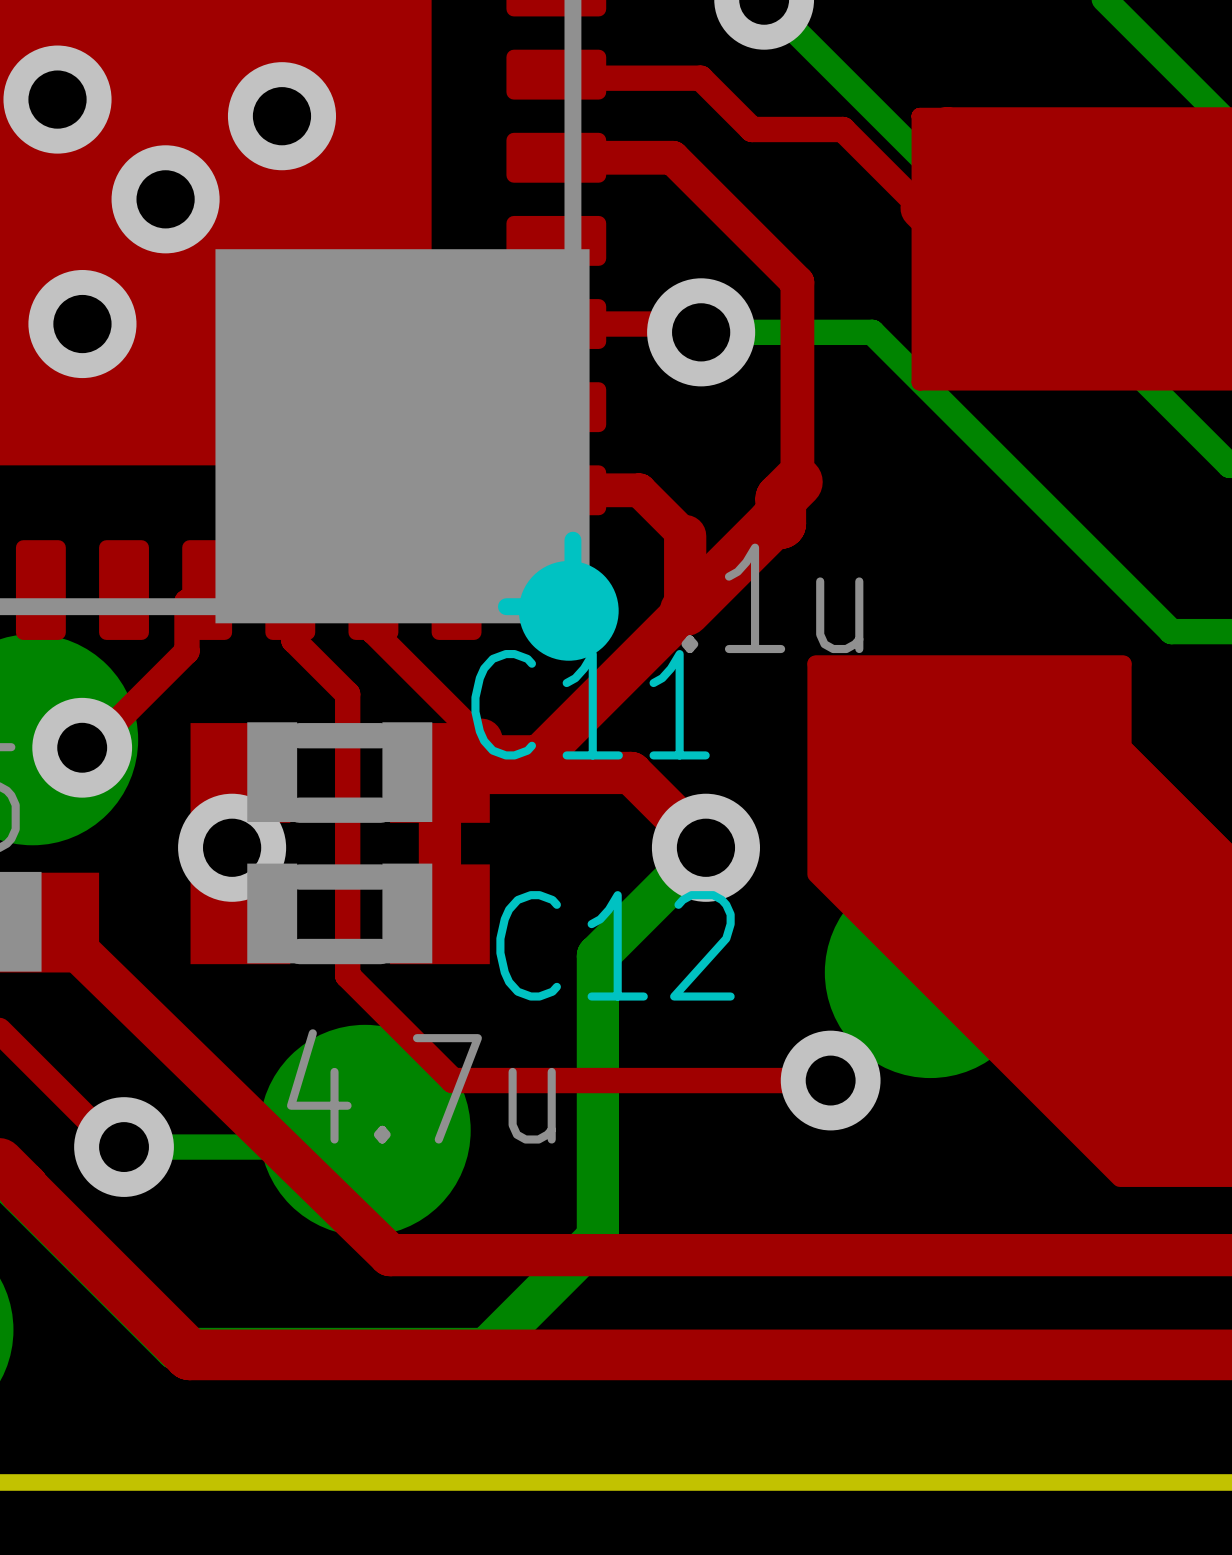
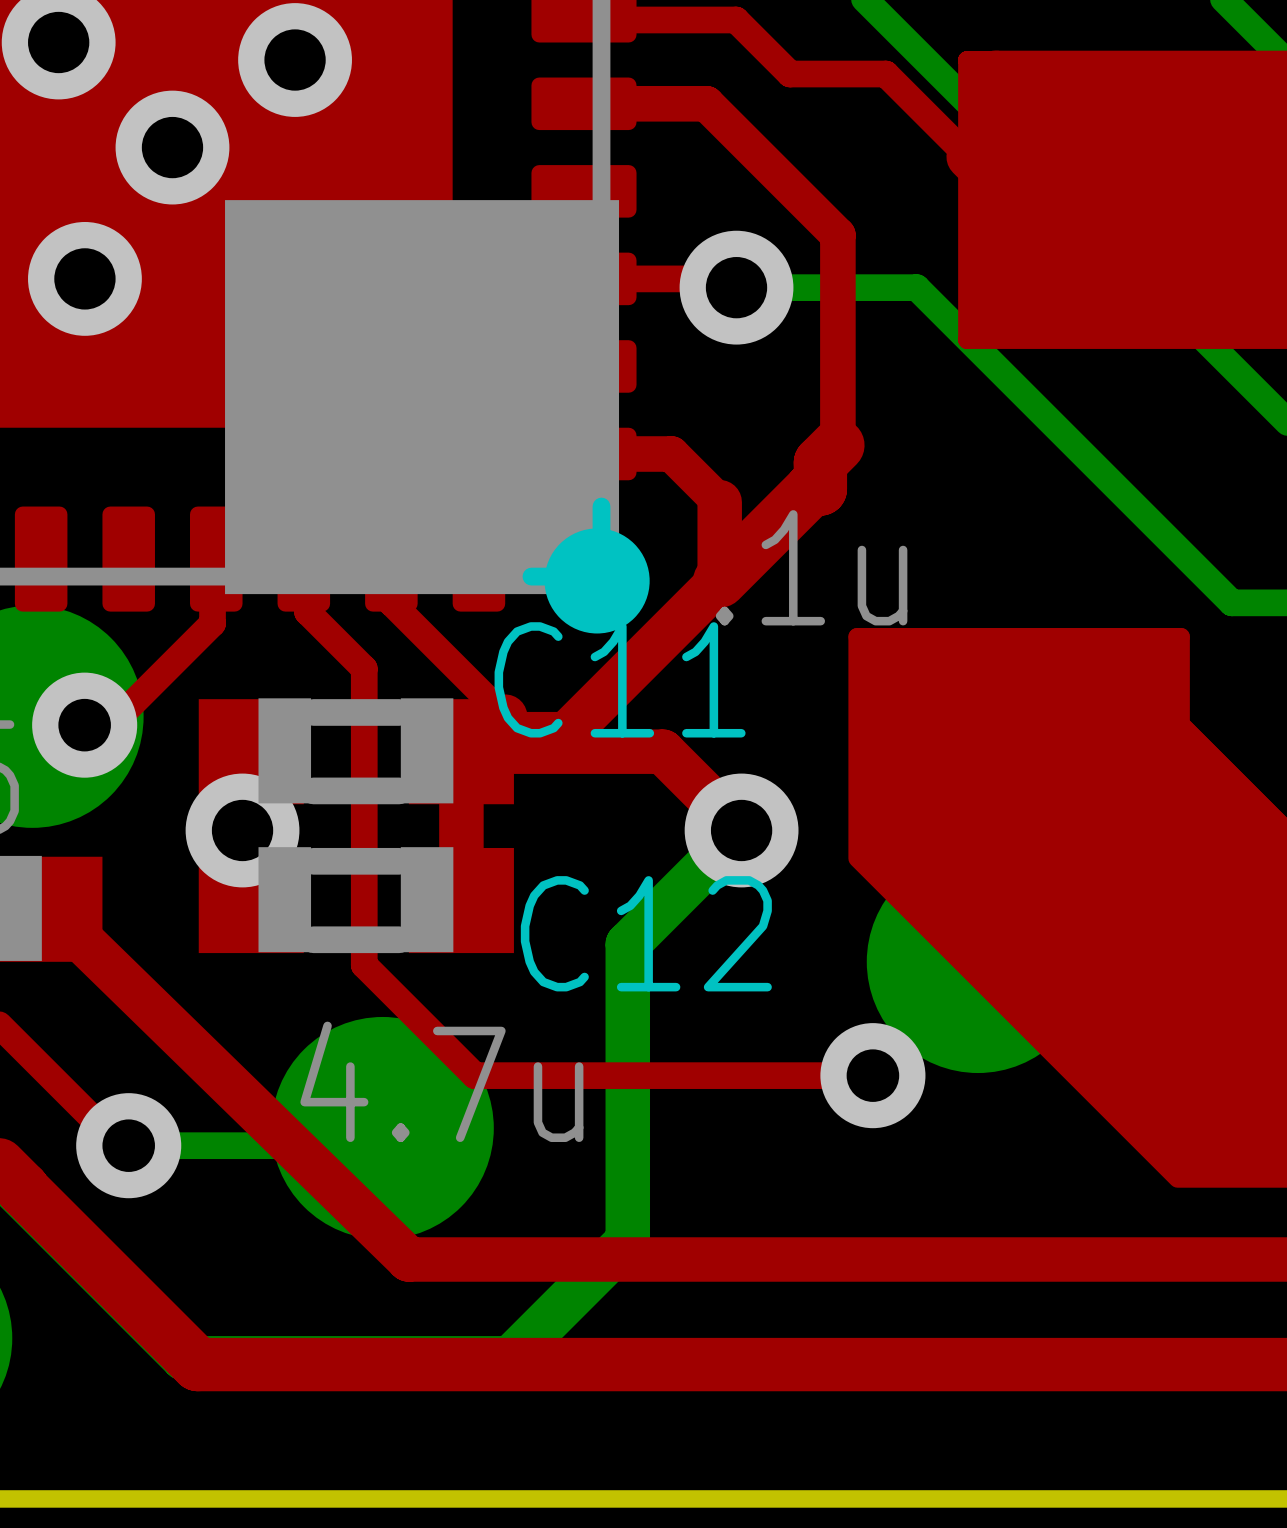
top track: (203, 592) (186, 601) (186, 651) (90, 747) -> (212, 561) (212, 623) (110, 725) (93, 725)

